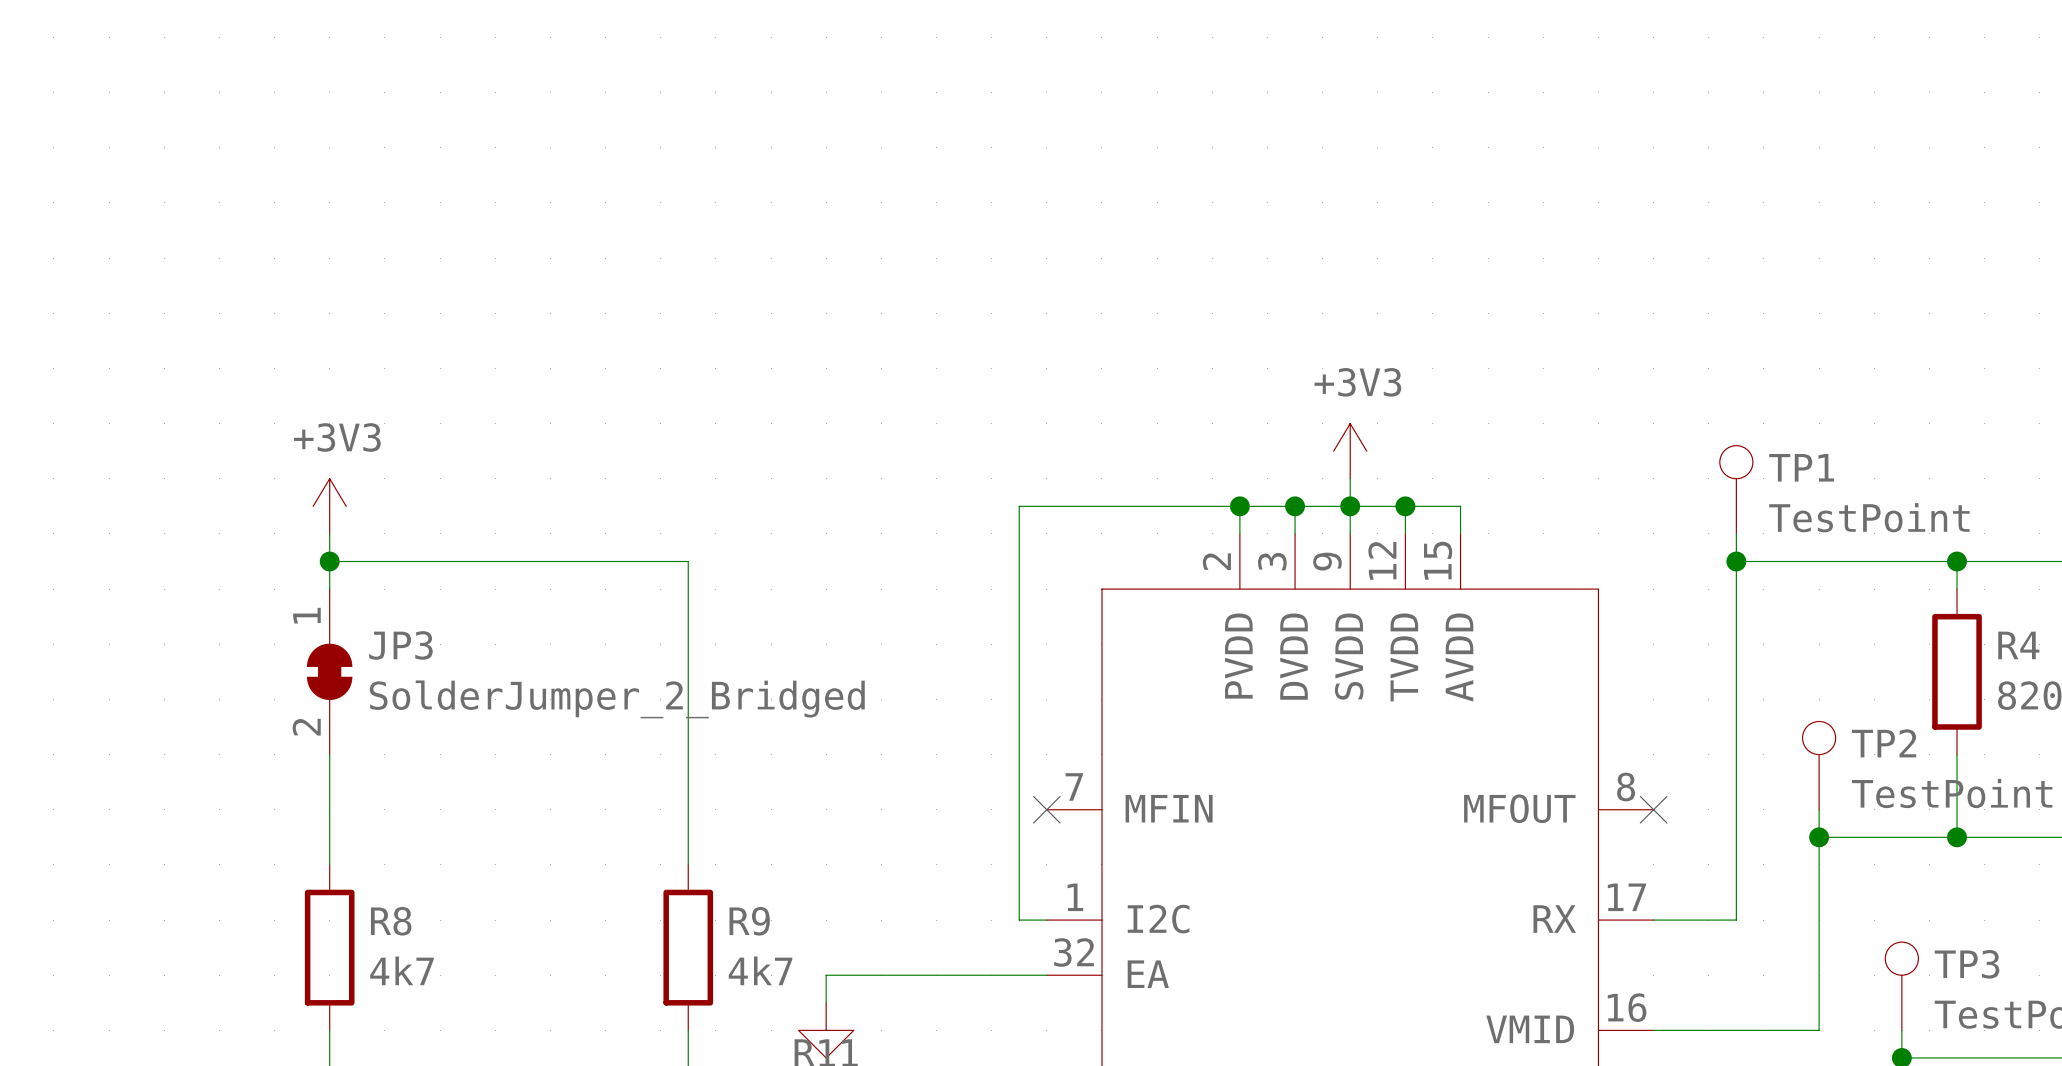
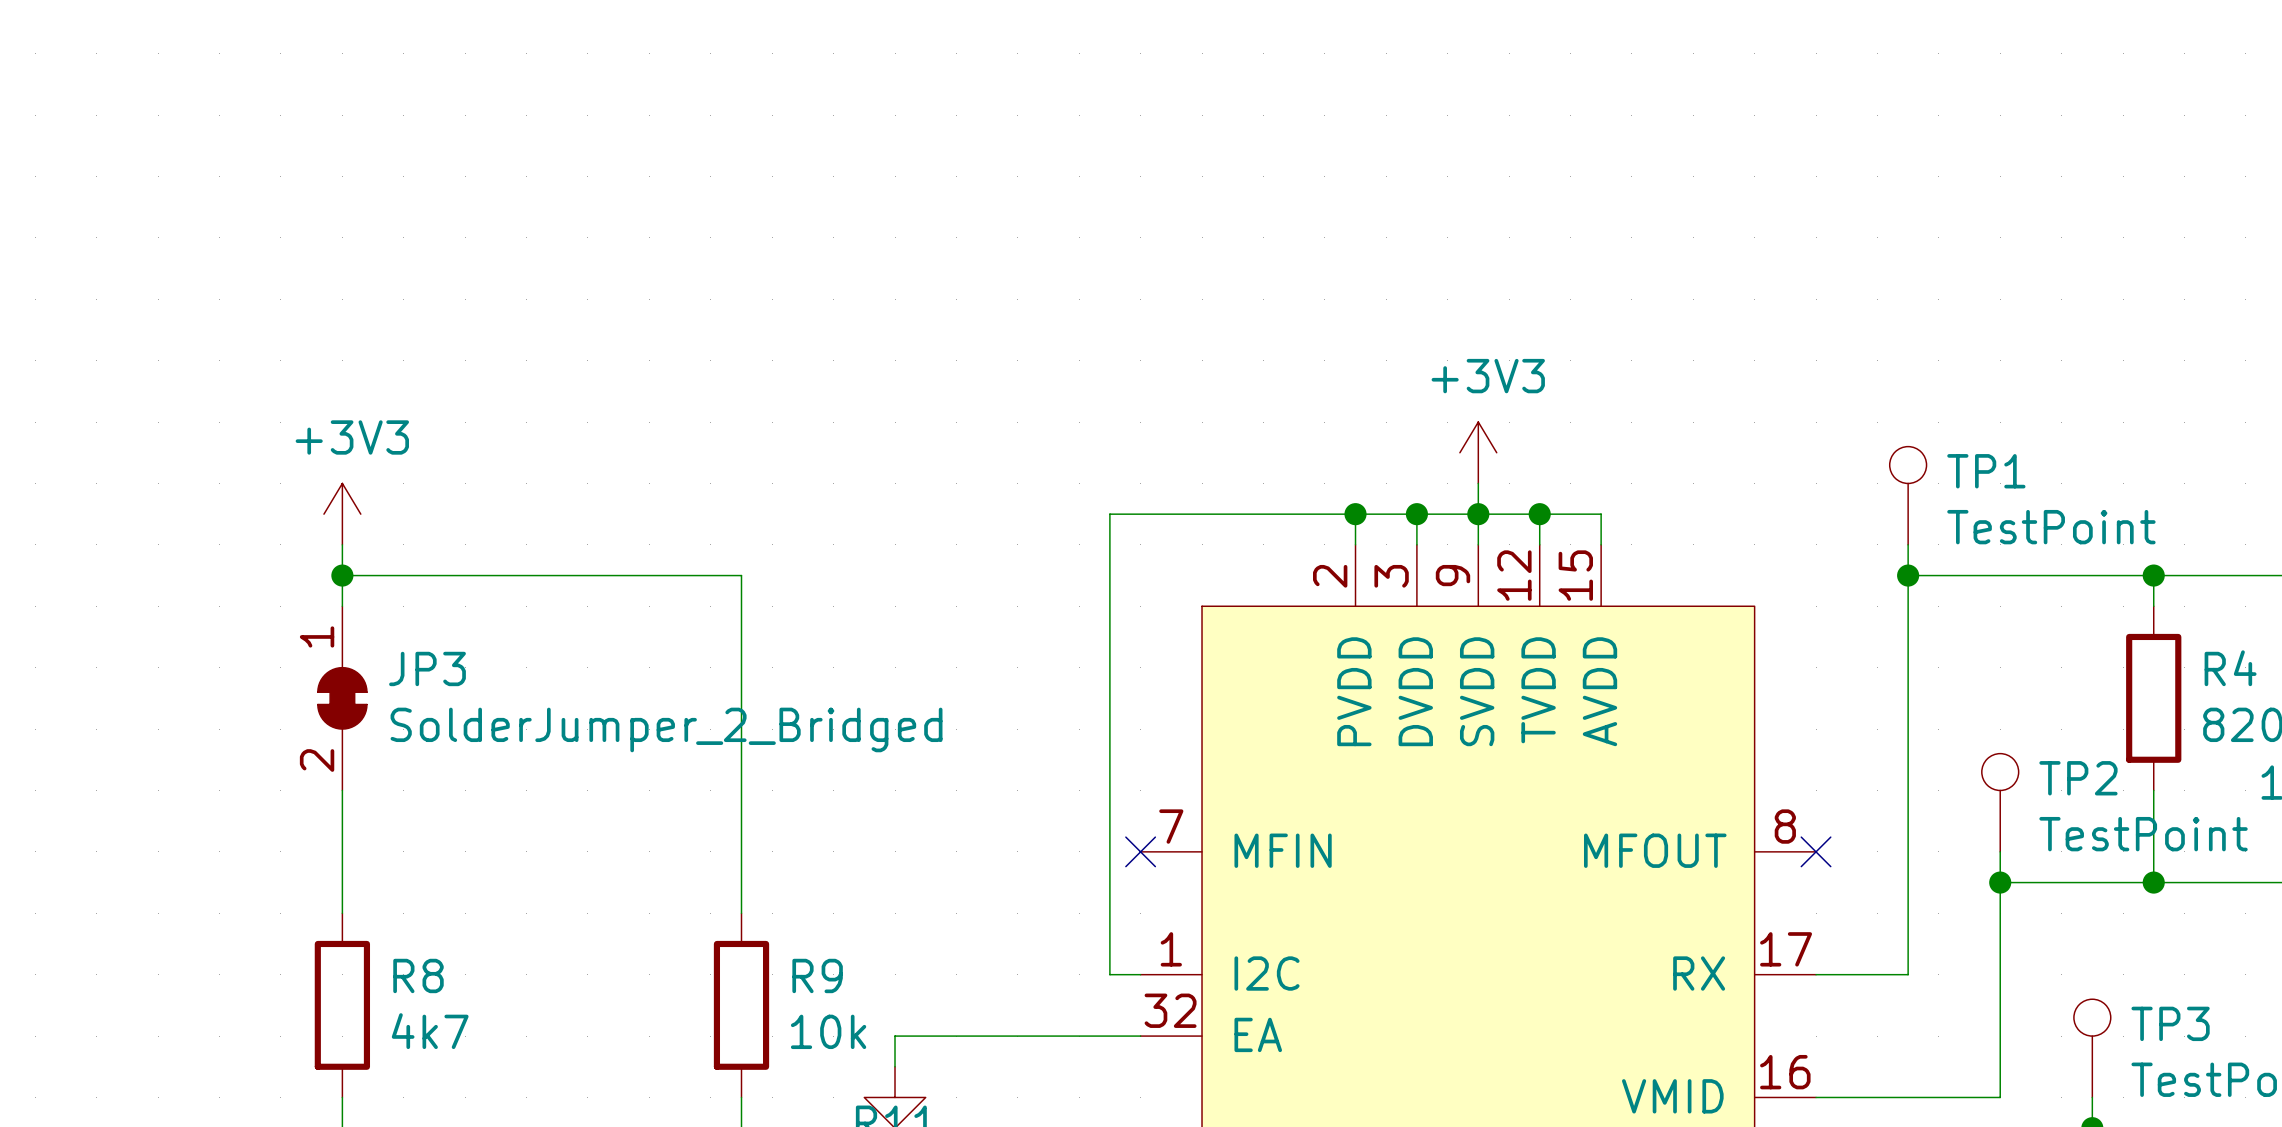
R9 value: 4k7 (760, 970) -> 10k (828, 1031)

